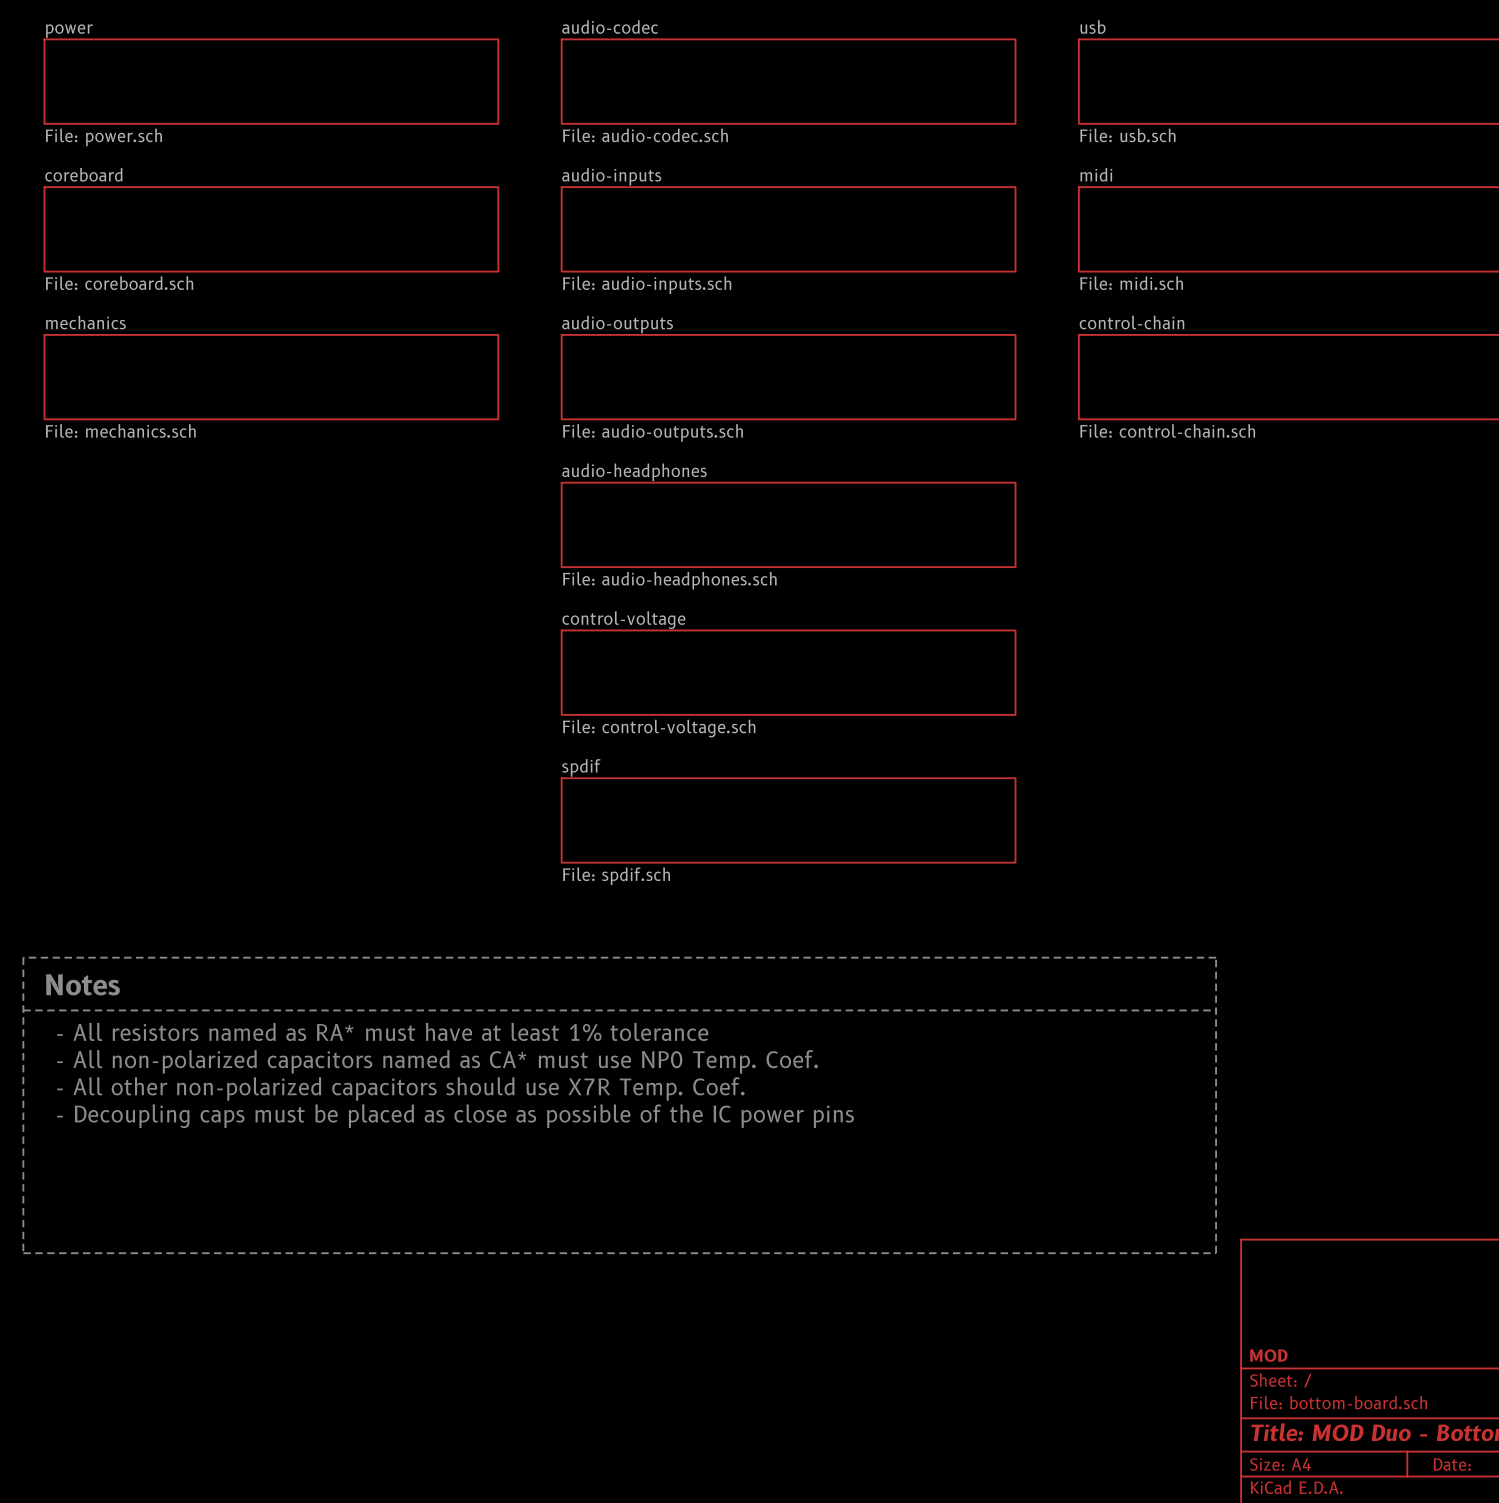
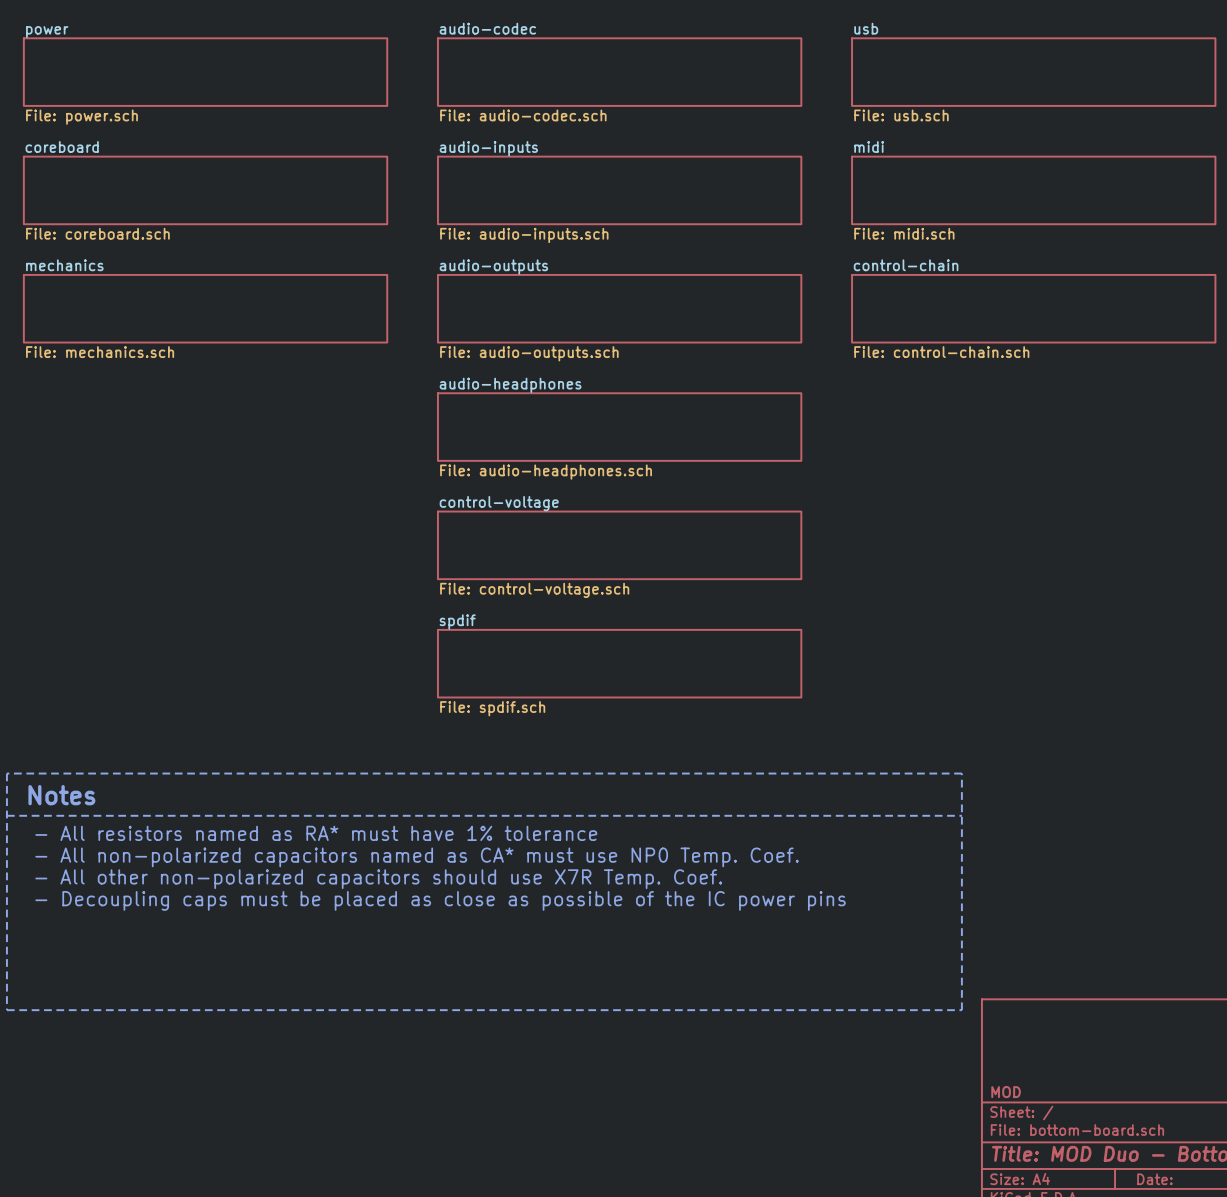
text: - All resistors named as RA* must have at least 1% tolerance (382, 1031) -> - All resistors named as RA* must have 1% tolerance (316, 833)

